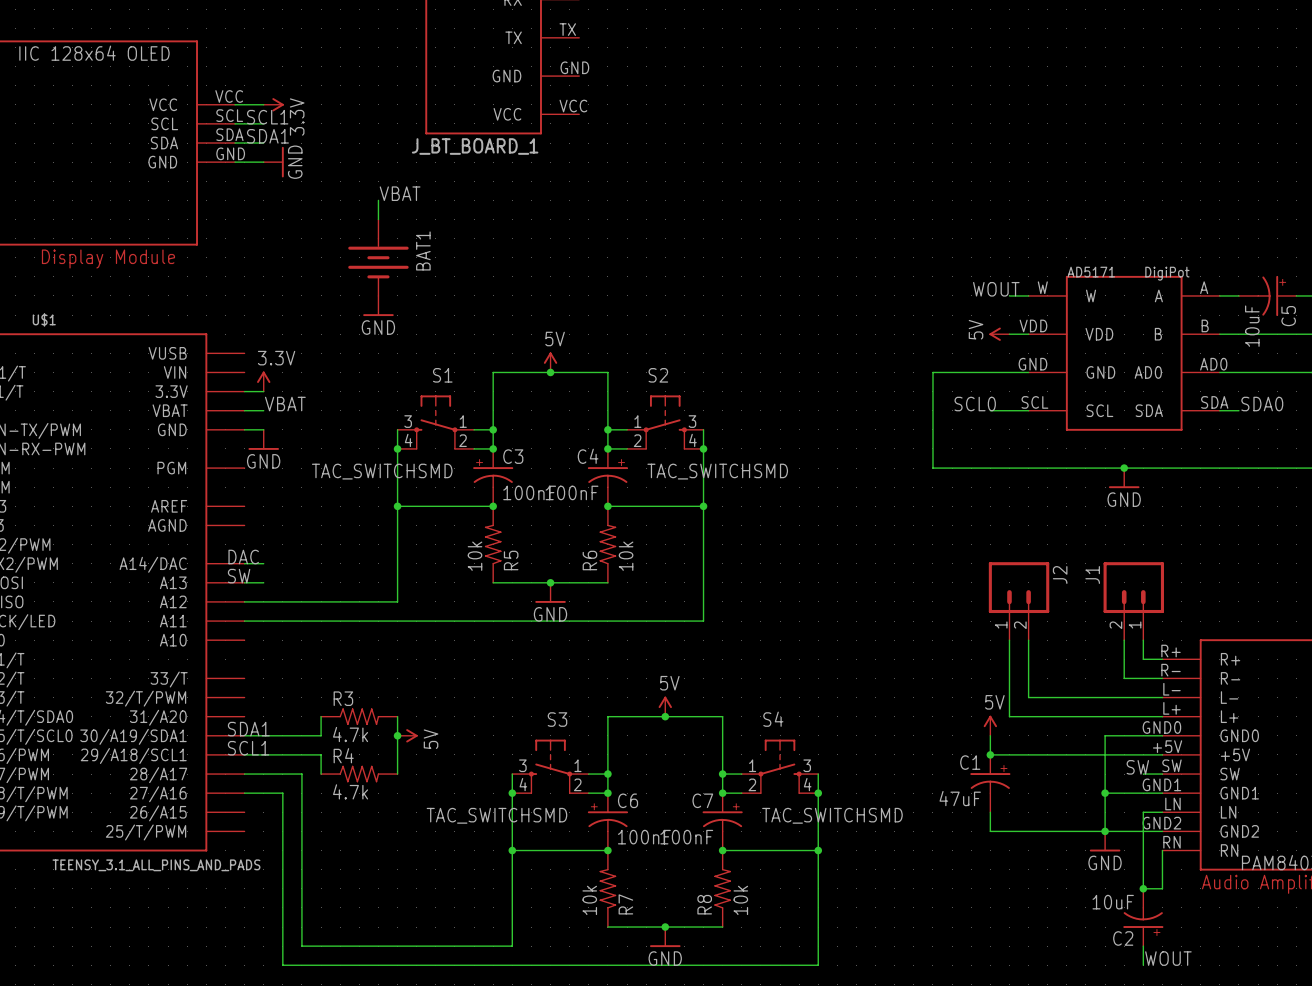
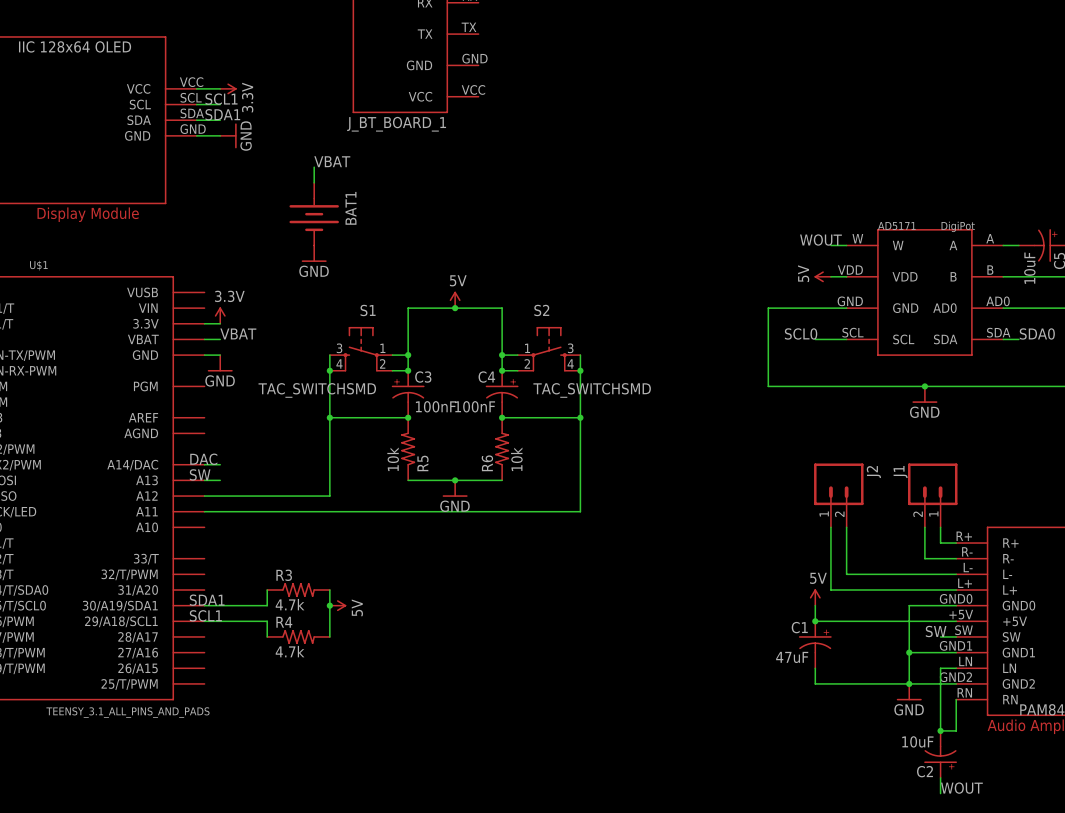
power symbol: 5V (665, 706) -> none
junction: (665, 716) -> none
S3: TAC_SWITCHSMD (550, 766) -> none
S4: TAC_SWITCHSMD (780, 766) -> none
wire: (244, 774) (301, 774) (301, 946) (512, 946) (512, 774) -> none
wire: (588, 774) (607, 774) -> none
junction: (607, 774) -> none
wire: (722, 774) (741, 774) -> none
junction: (722, 774) -> none
wire: (818, 774) (818, 965) (282, 965) (282, 793) (244, 793) -> none
junction: (512, 793) -> none
wire: (588, 793) (607, 793) (607, 716) (722, 716) (722, 793) (741, 793) -> none
junction: (607, 793) -> none
junction: (722, 793) -> none
junction: (818, 793) -> none
C6: 100nF (607, 821) -> none
C7: 100nF (722, 821) -> none
wire: (512, 850) (607, 850) -> none
junction: (512, 850) -> none
junction: (607, 850) -> none
wire: (722, 850) (818, 850) -> none
junction: (722, 850) -> none
junction: (818, 850) -> none
R7: 10k (607, 888) -> none
R8: 10k (722, 888) -> none
wire: (607, 927) (722, 927) -> none
junction: (665, 927) -> none
power symbol: GND (665, 937) -> none

